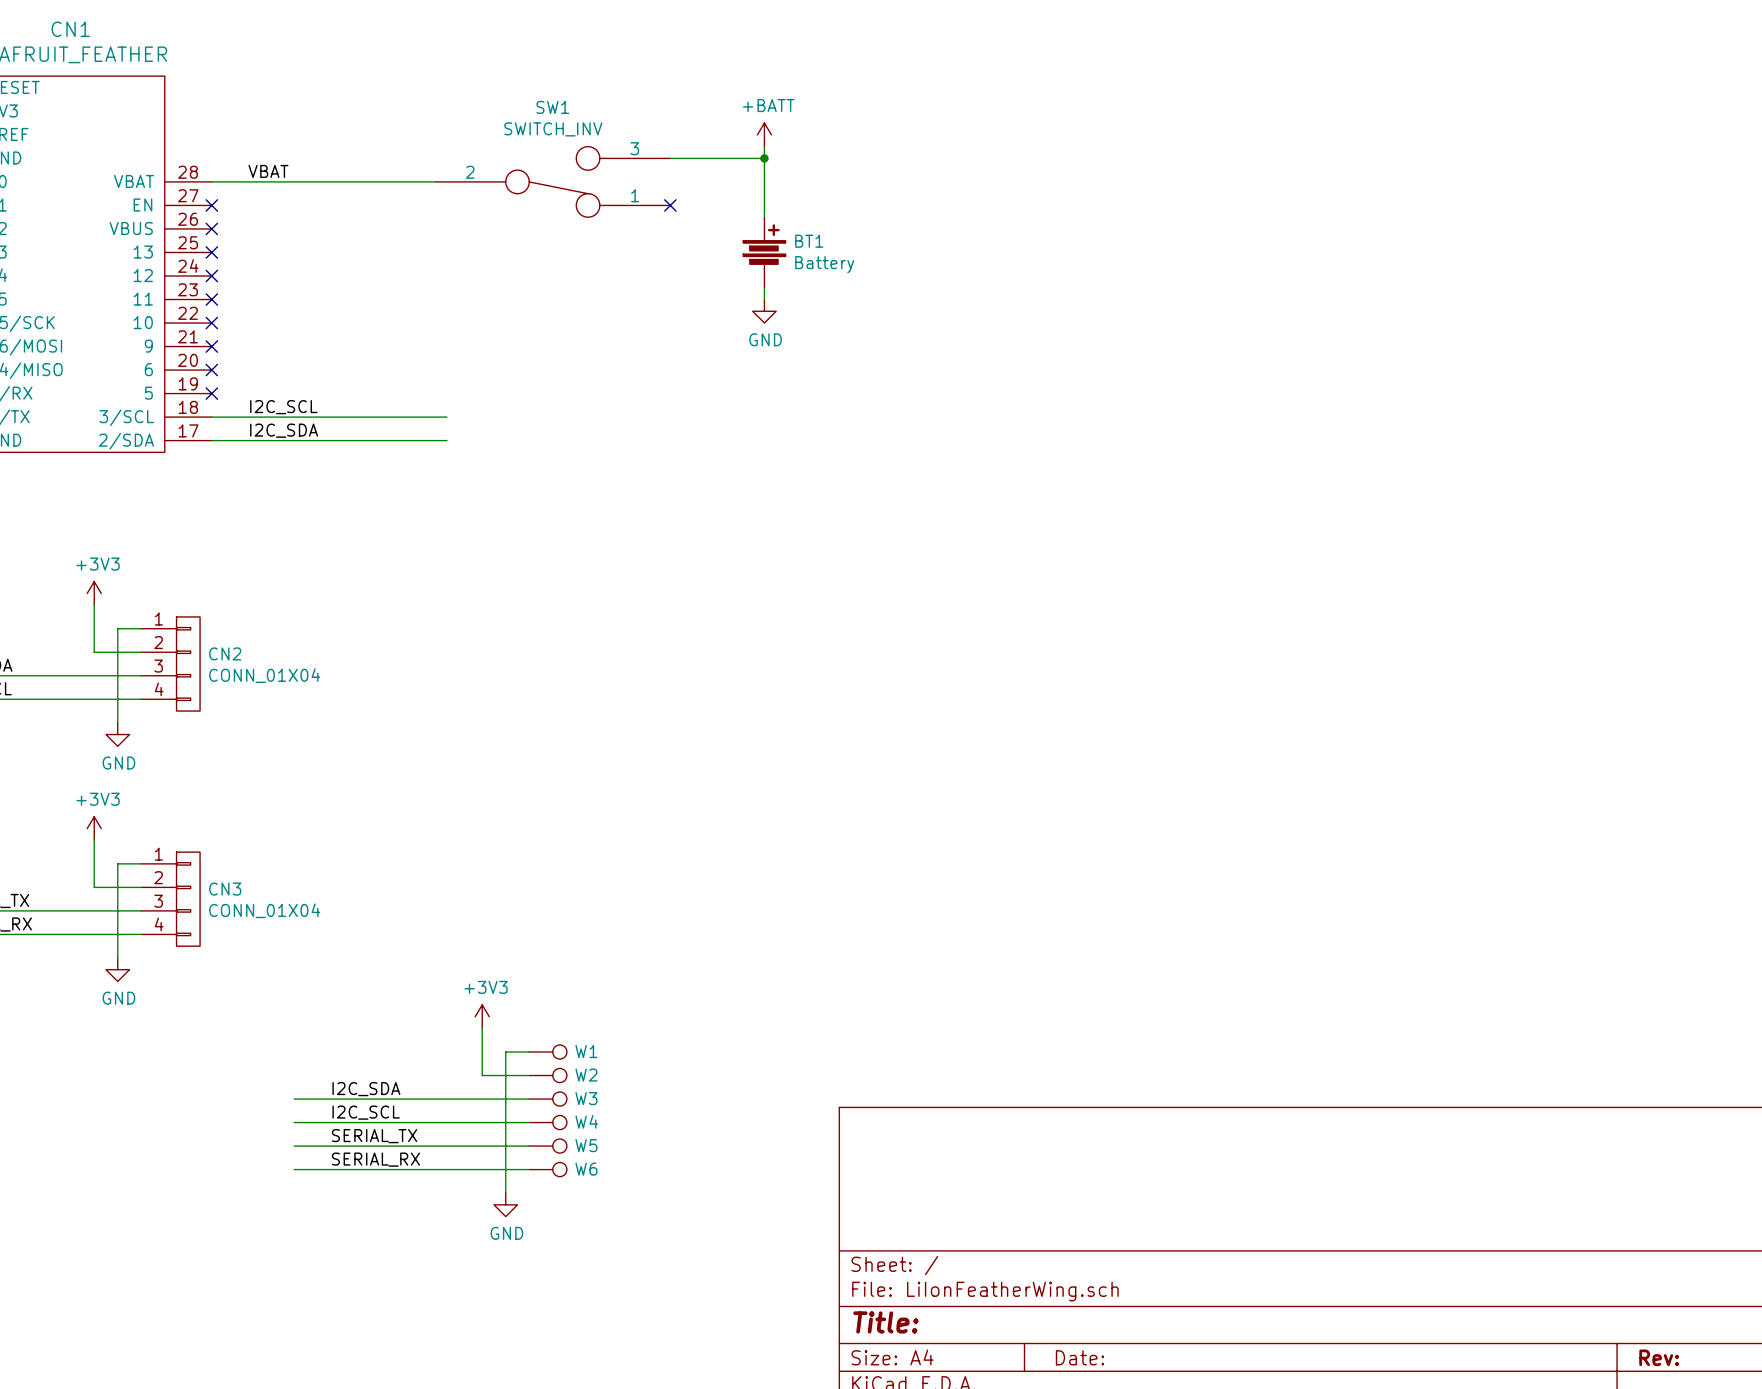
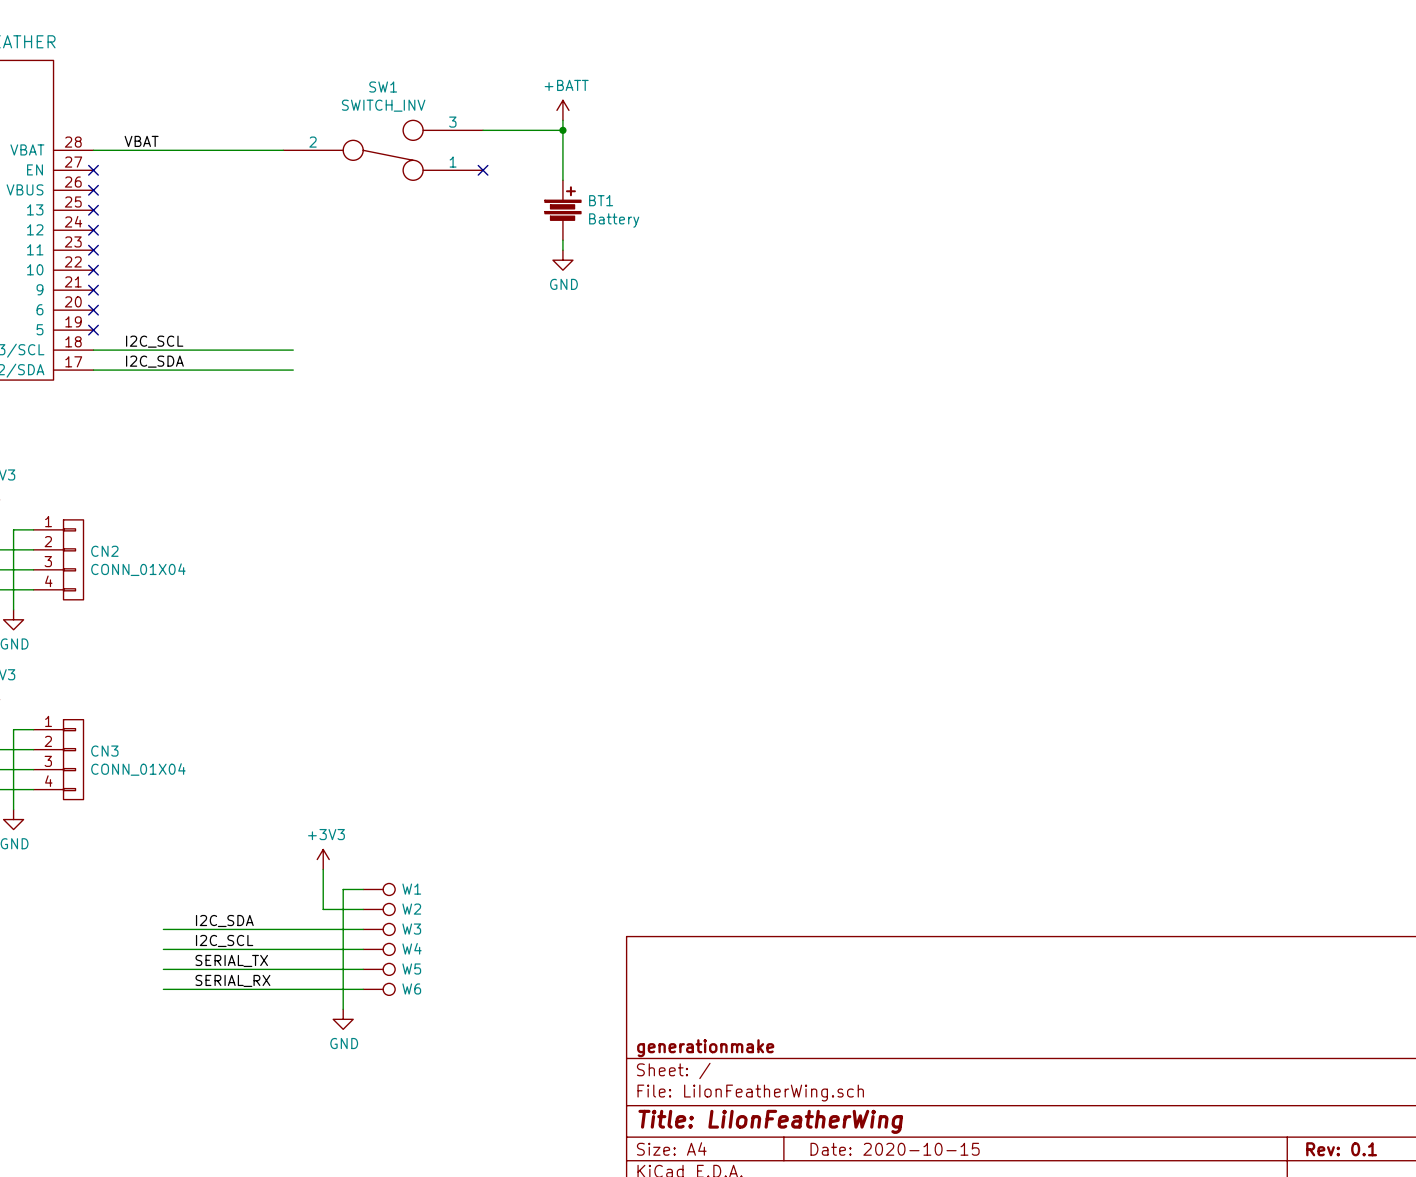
title block: none -> generationmake (705, 1048)
title block: Title: (885, 1322) -> Title: LiIonFeatherWing (770, 1121)
title block: Date: (1079, 1357) -> Date: 2020-10-15 (895, 1149)
title block: Rev: (1659, 1357) -> Rev: 0.1 (1341, 1149)

